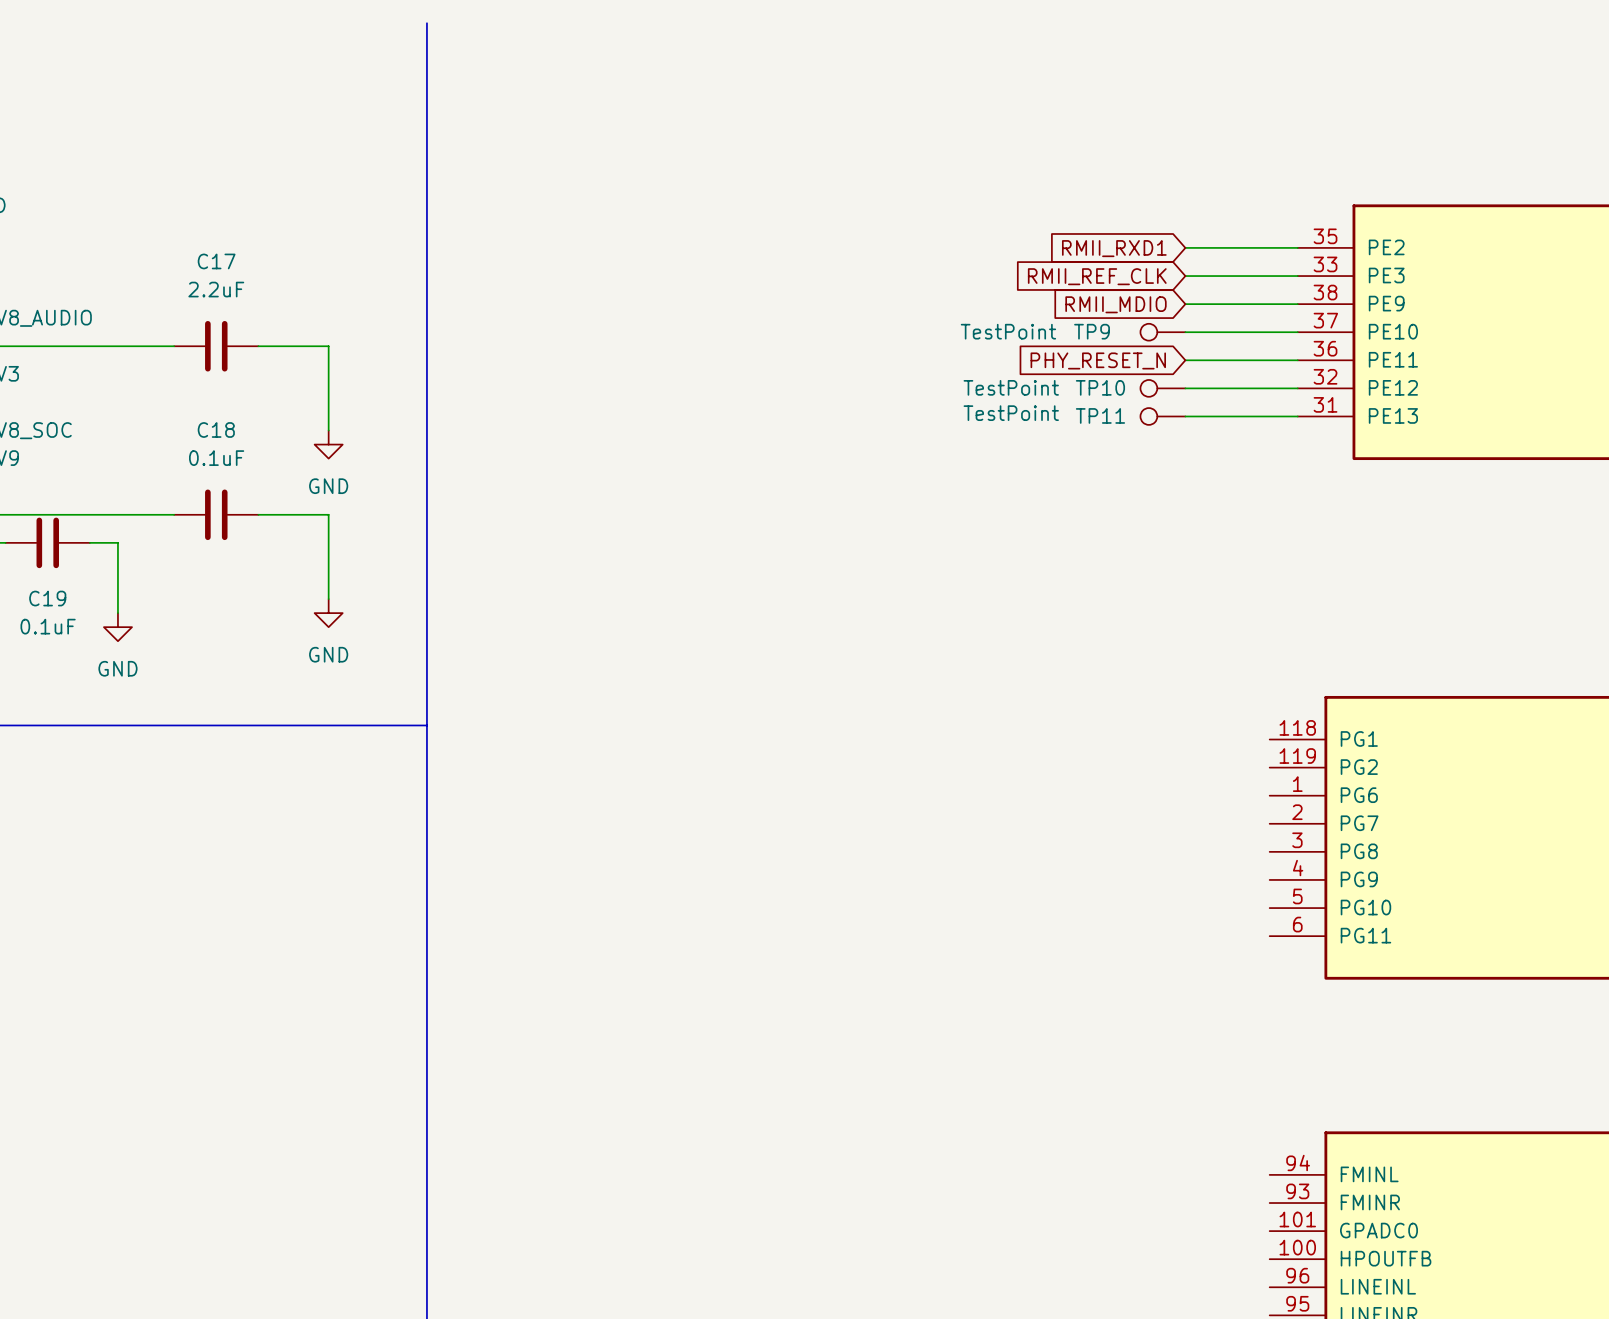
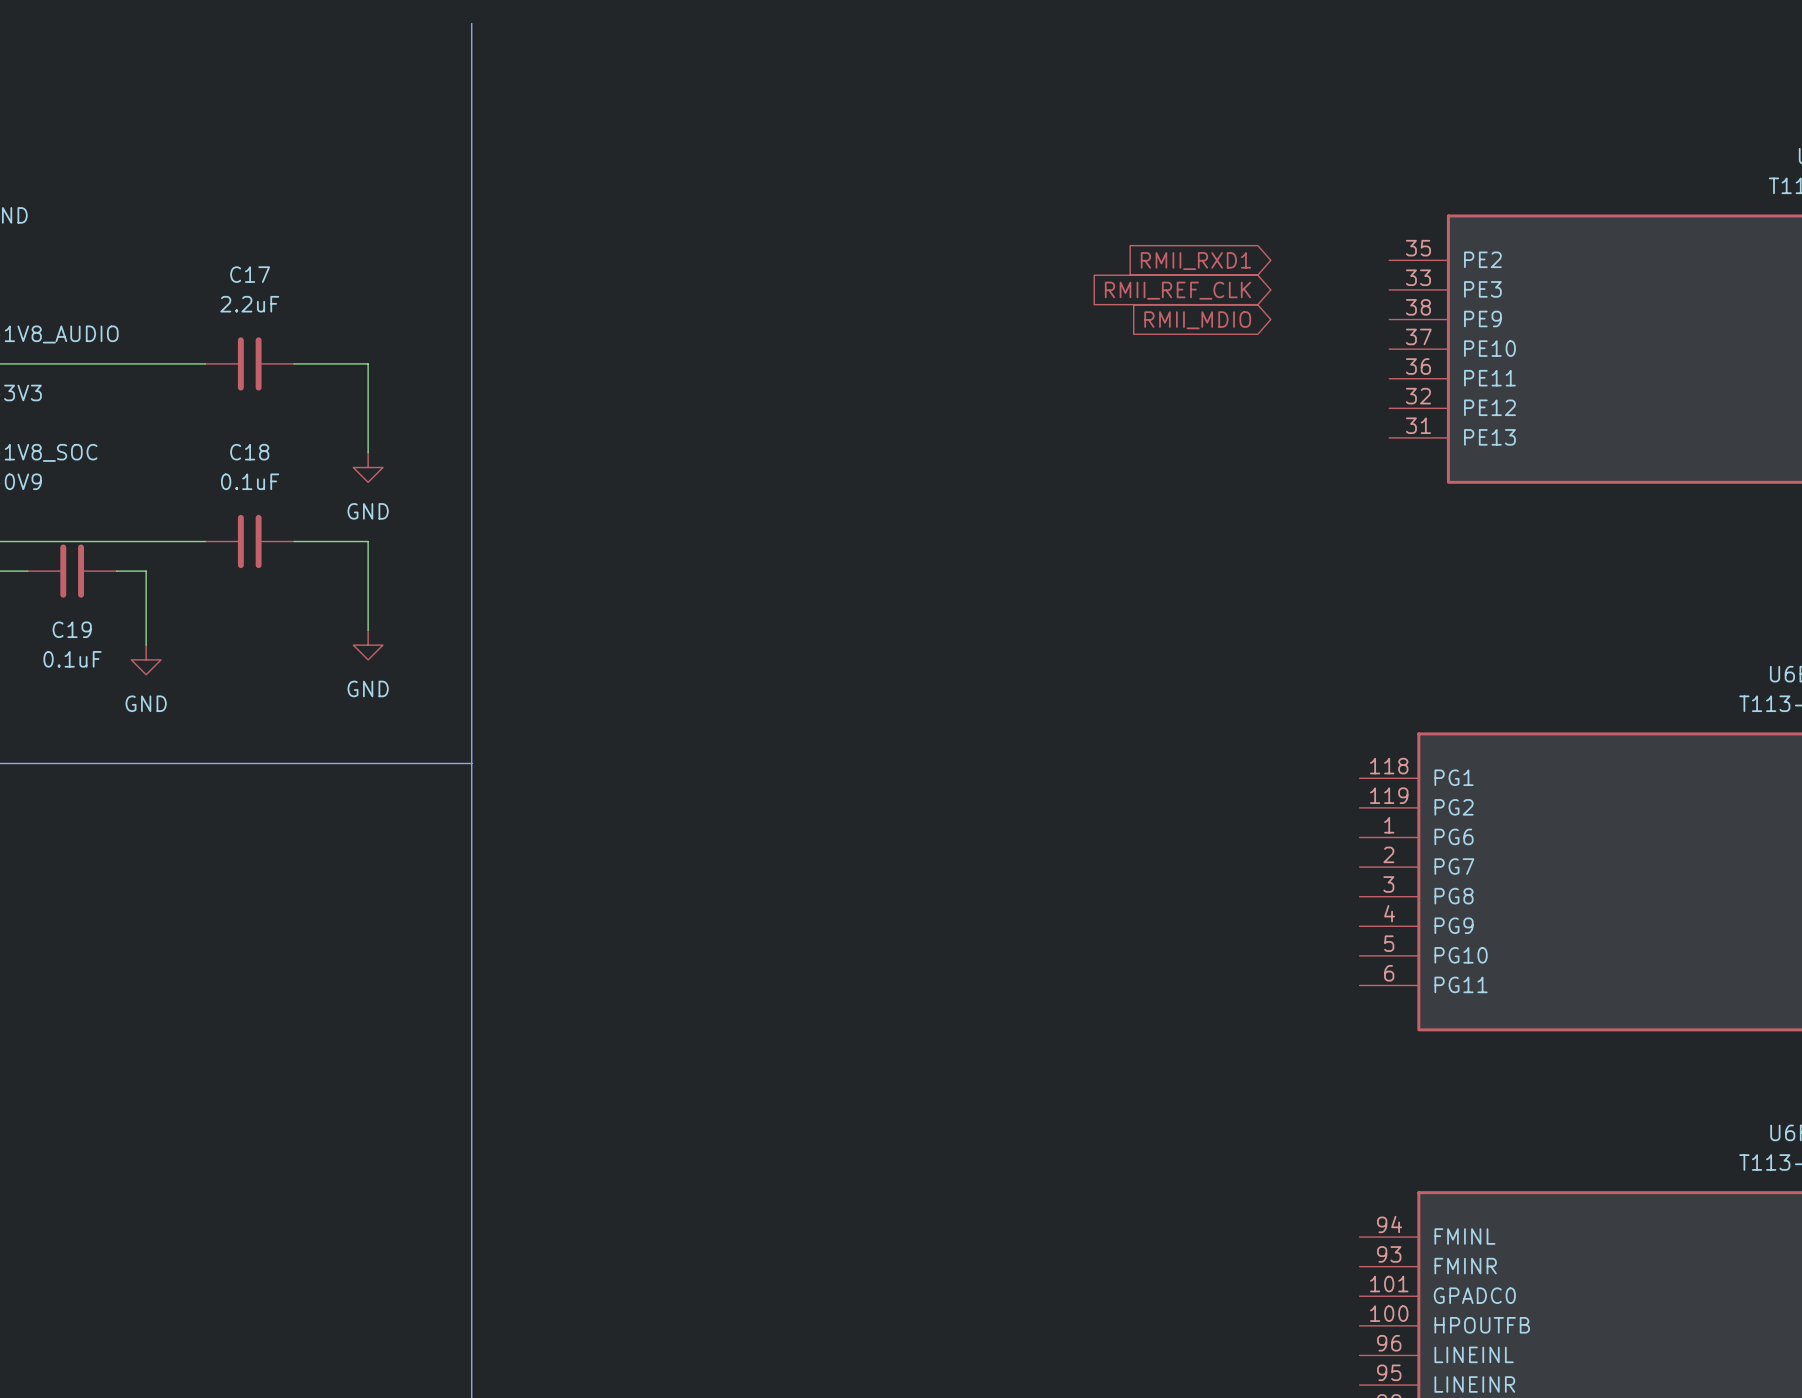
wire: (1185, 247) (1297, 247) -> none
wire: (1185, 276) (1297, 276) -> none
wire: (1185, 304) (1297, 304) -> none
TP9: TestPoint (1162, 332) -> none
wire: (1185, 332) (1297, 332) -> none
global label: PHY_RESET_N (1098, 360) -> none
wire: (1185, 360) (1297, 360) -> none
TP10: TestPoint (1162, 388) -> none
wire: (1185, 388) (1297, 388) -> none
TP11: TestPoint (1162, 416) -> none
wire: (1185, 416) (1297, 416) -> none

